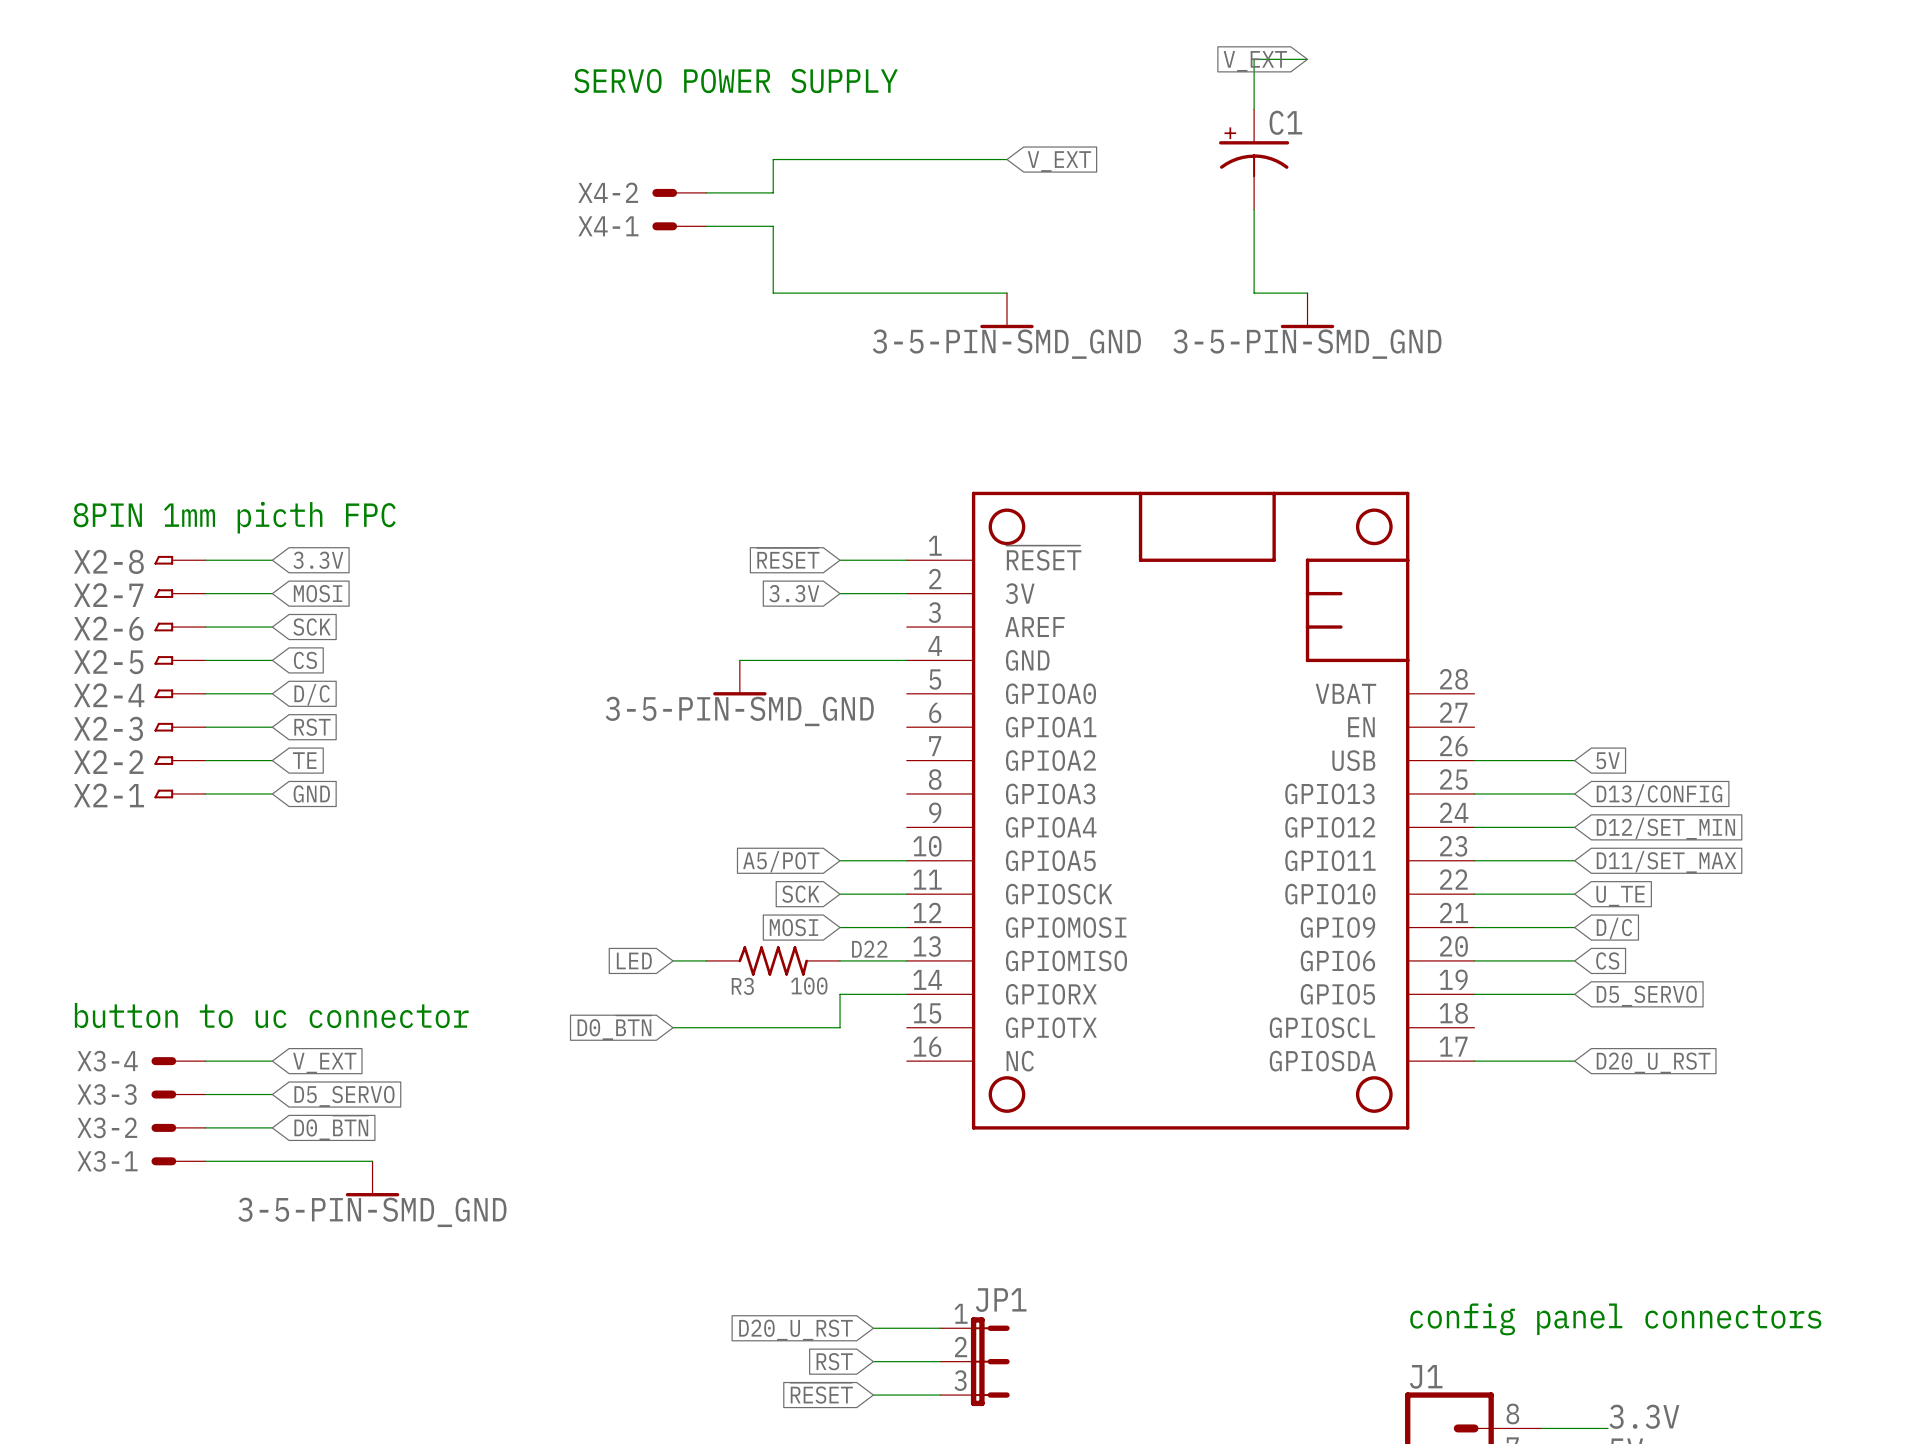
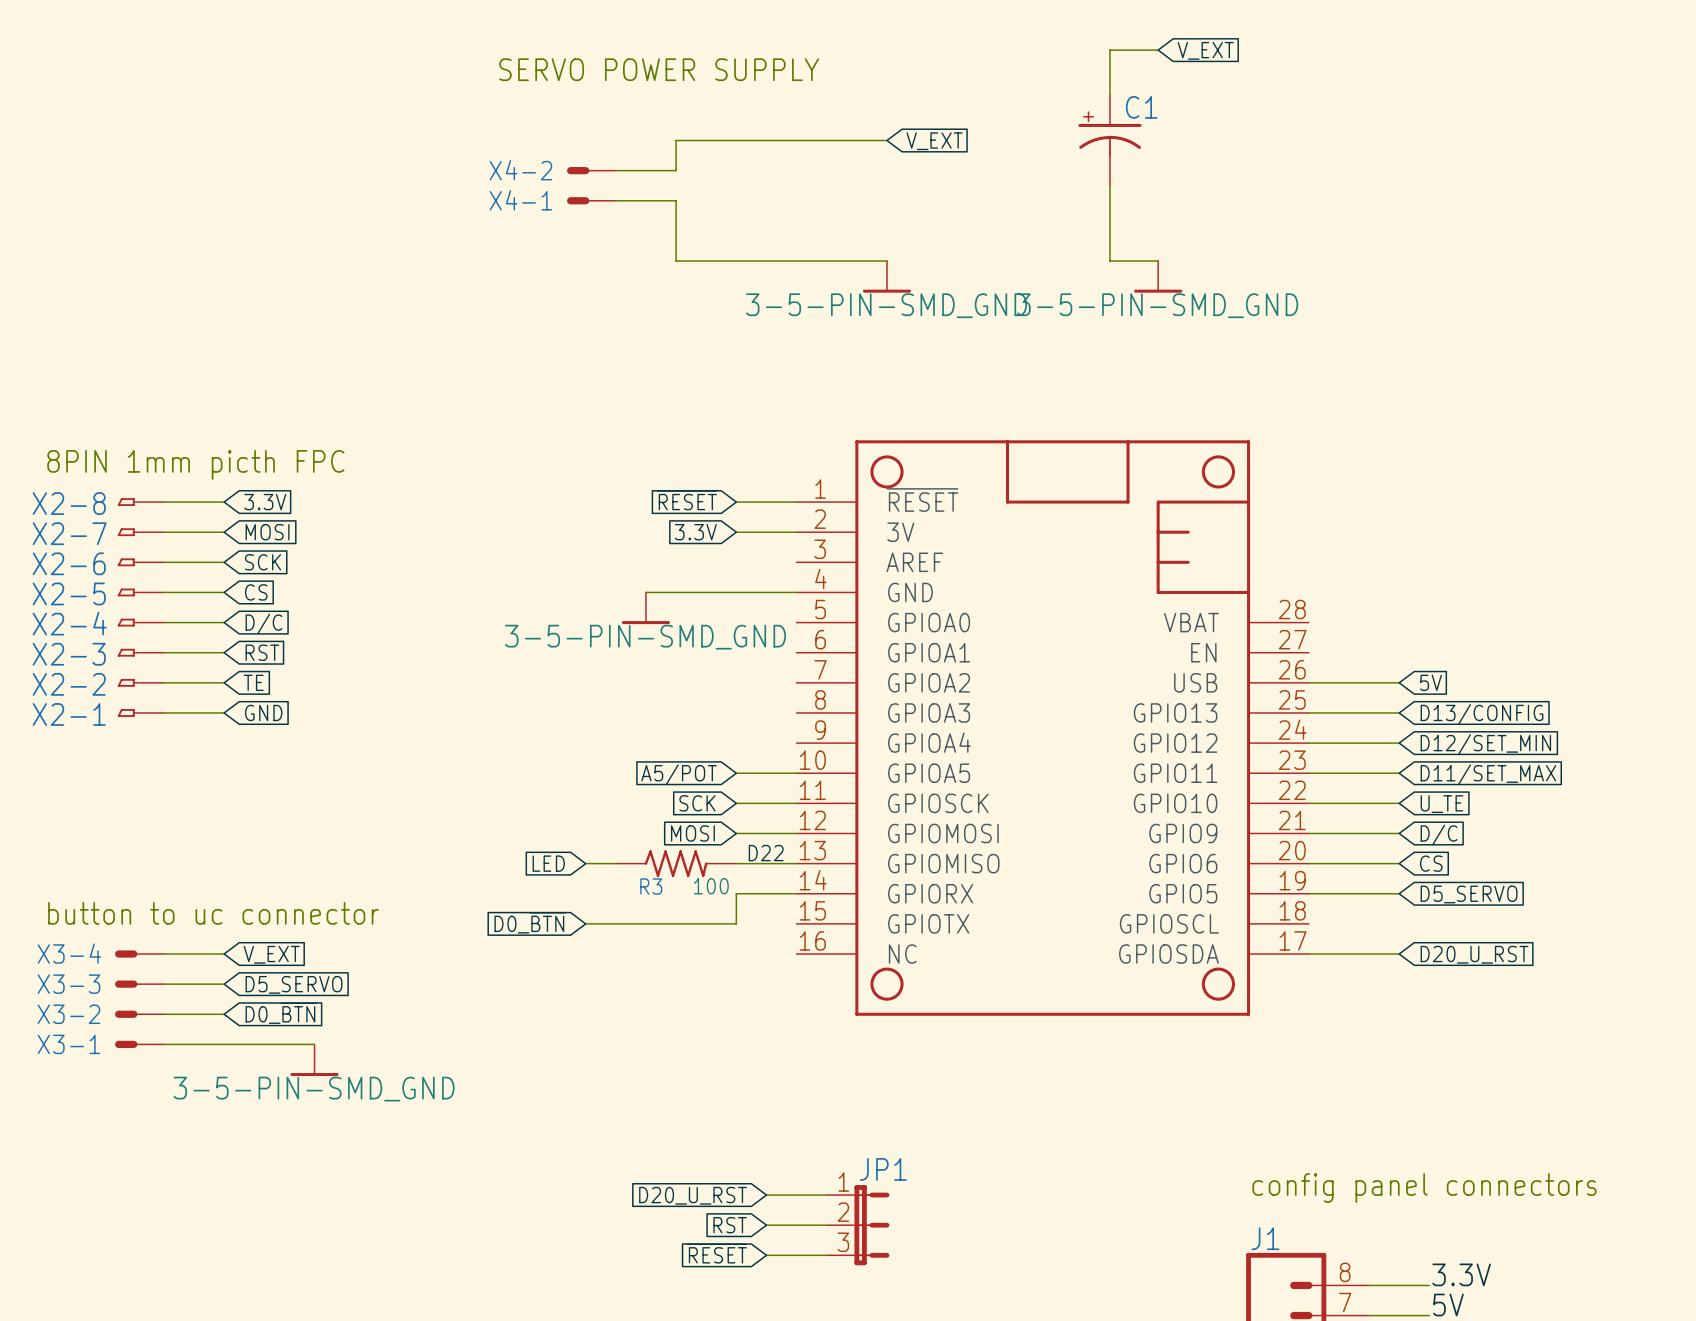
global label rotation: 0° (1255, 61) -> 180° (1205, 50)

